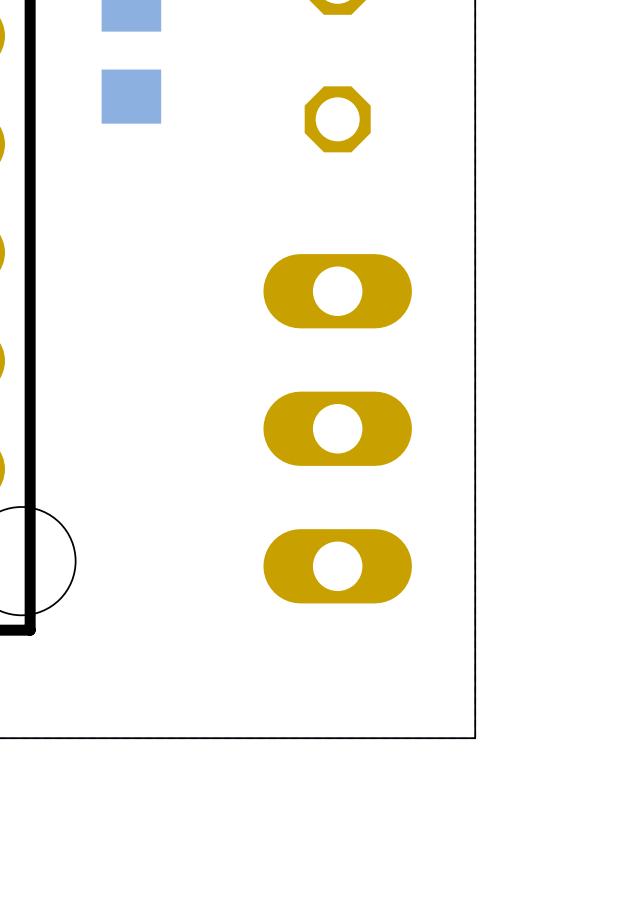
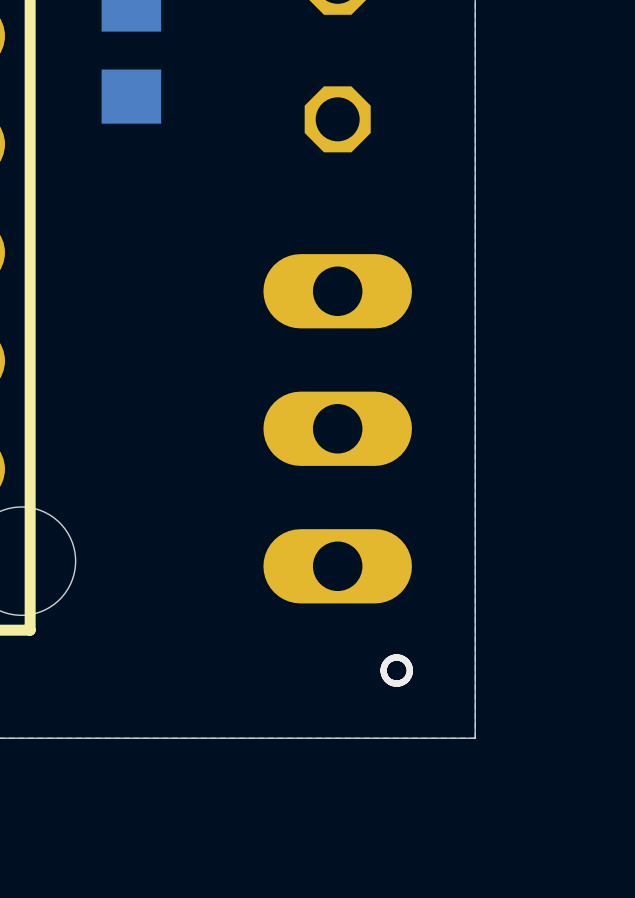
via: none -> (396, 670)

